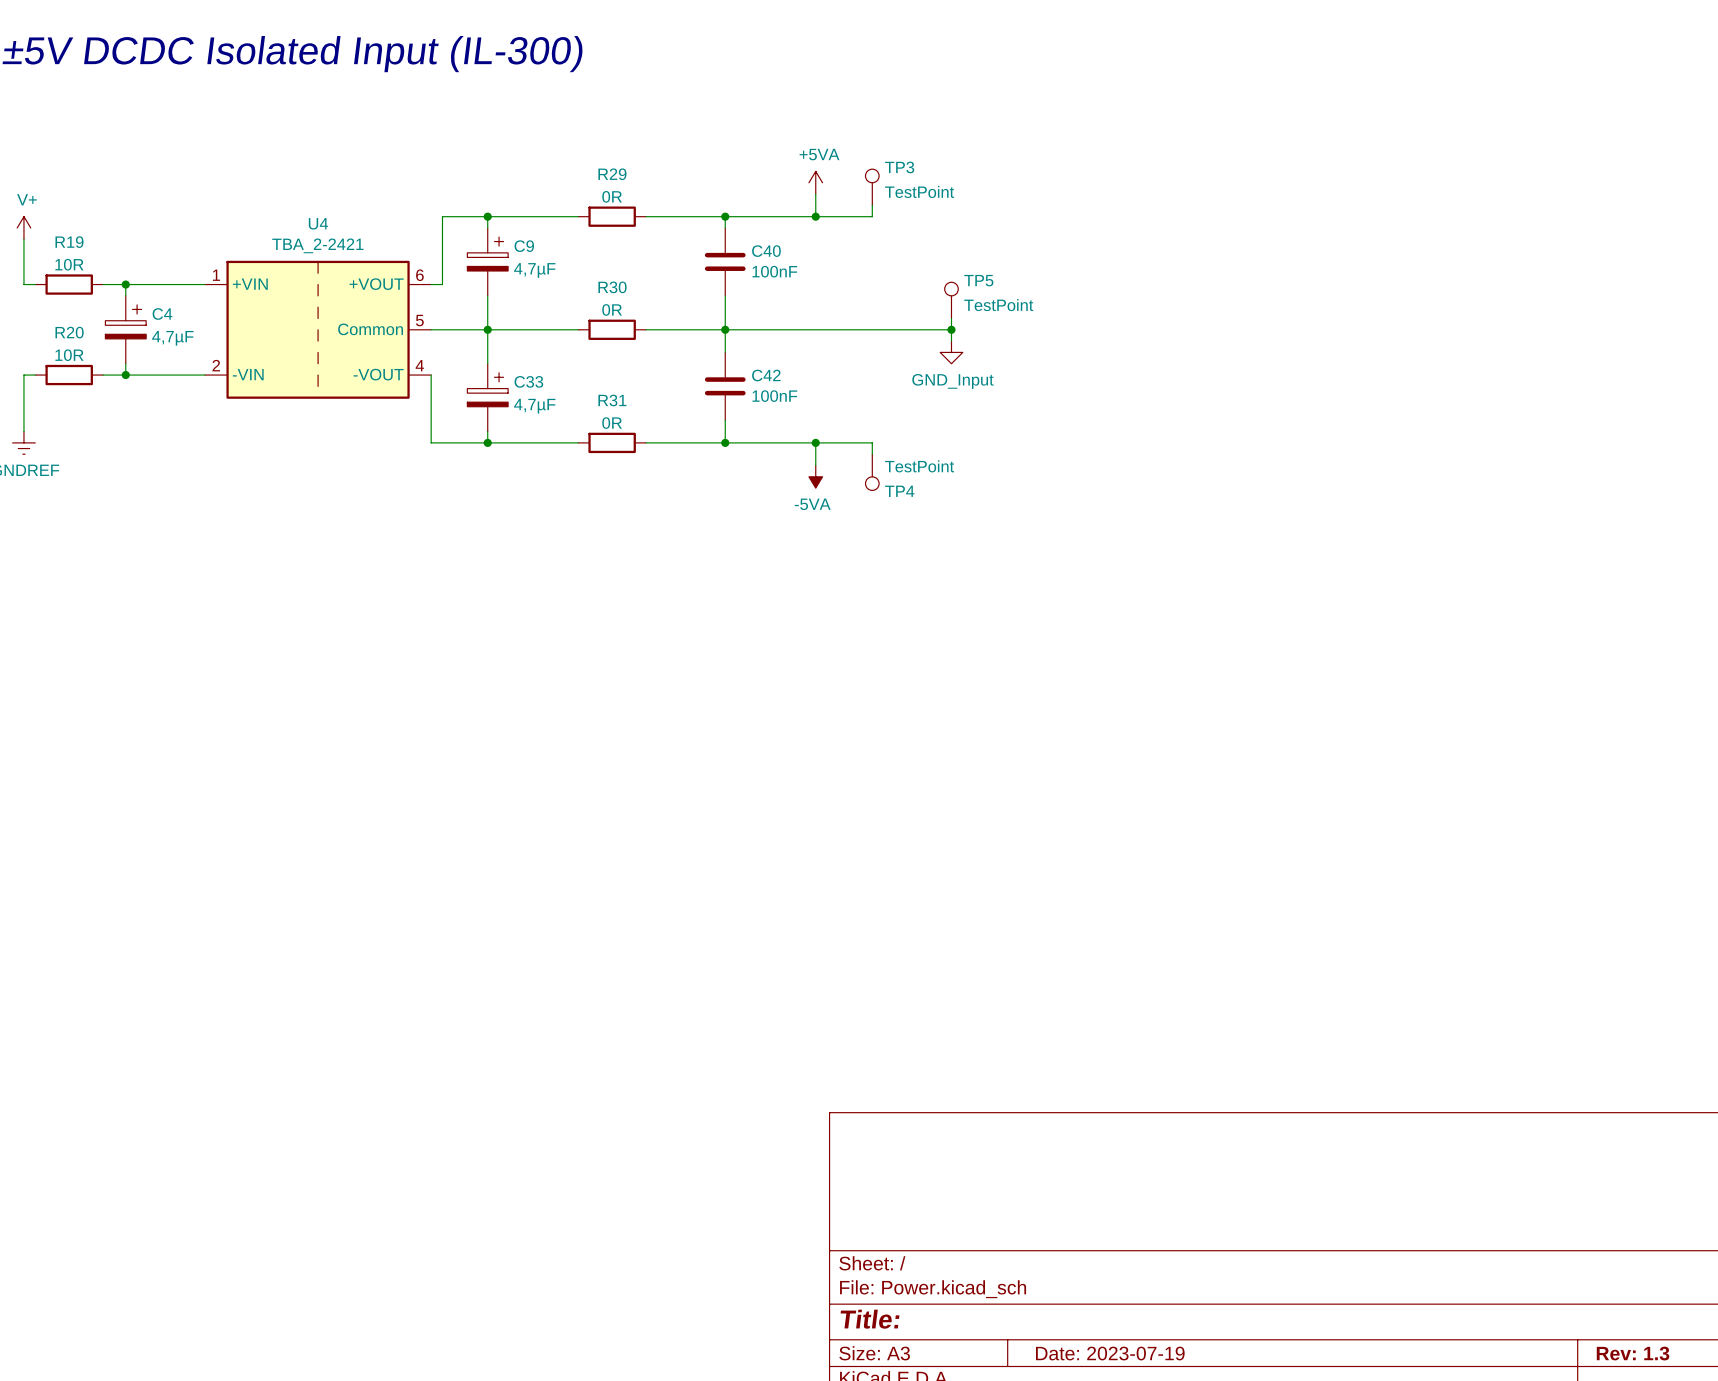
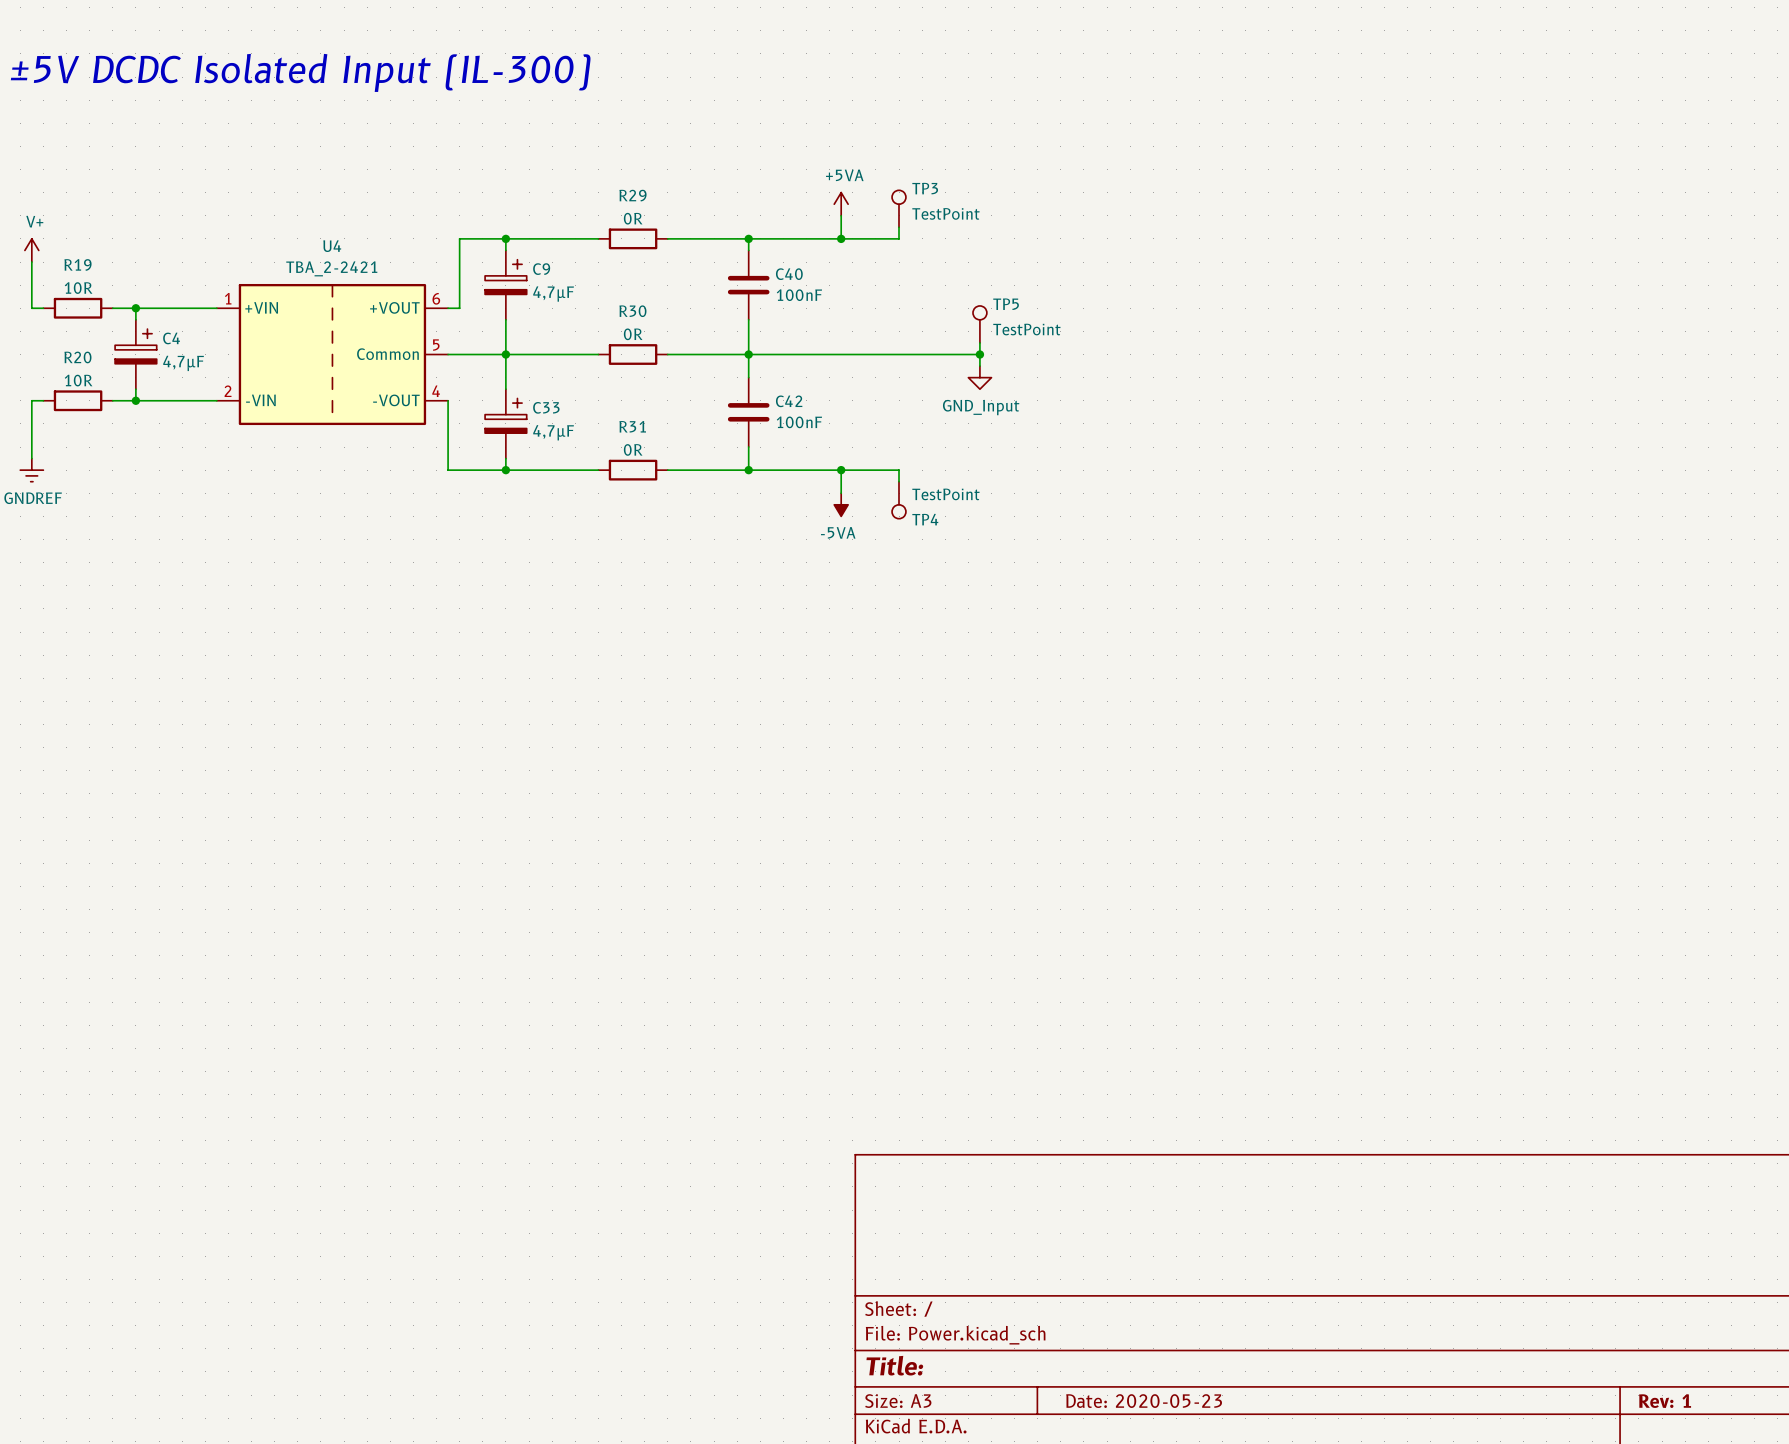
title block: Date: 2023-07-19 (1110, 1353) -> Date: 2020-05-23 (1144, 1401)
title block: Rev: 1.3 (1633, 1353) -> Rev: 1 (1665, 1401)

